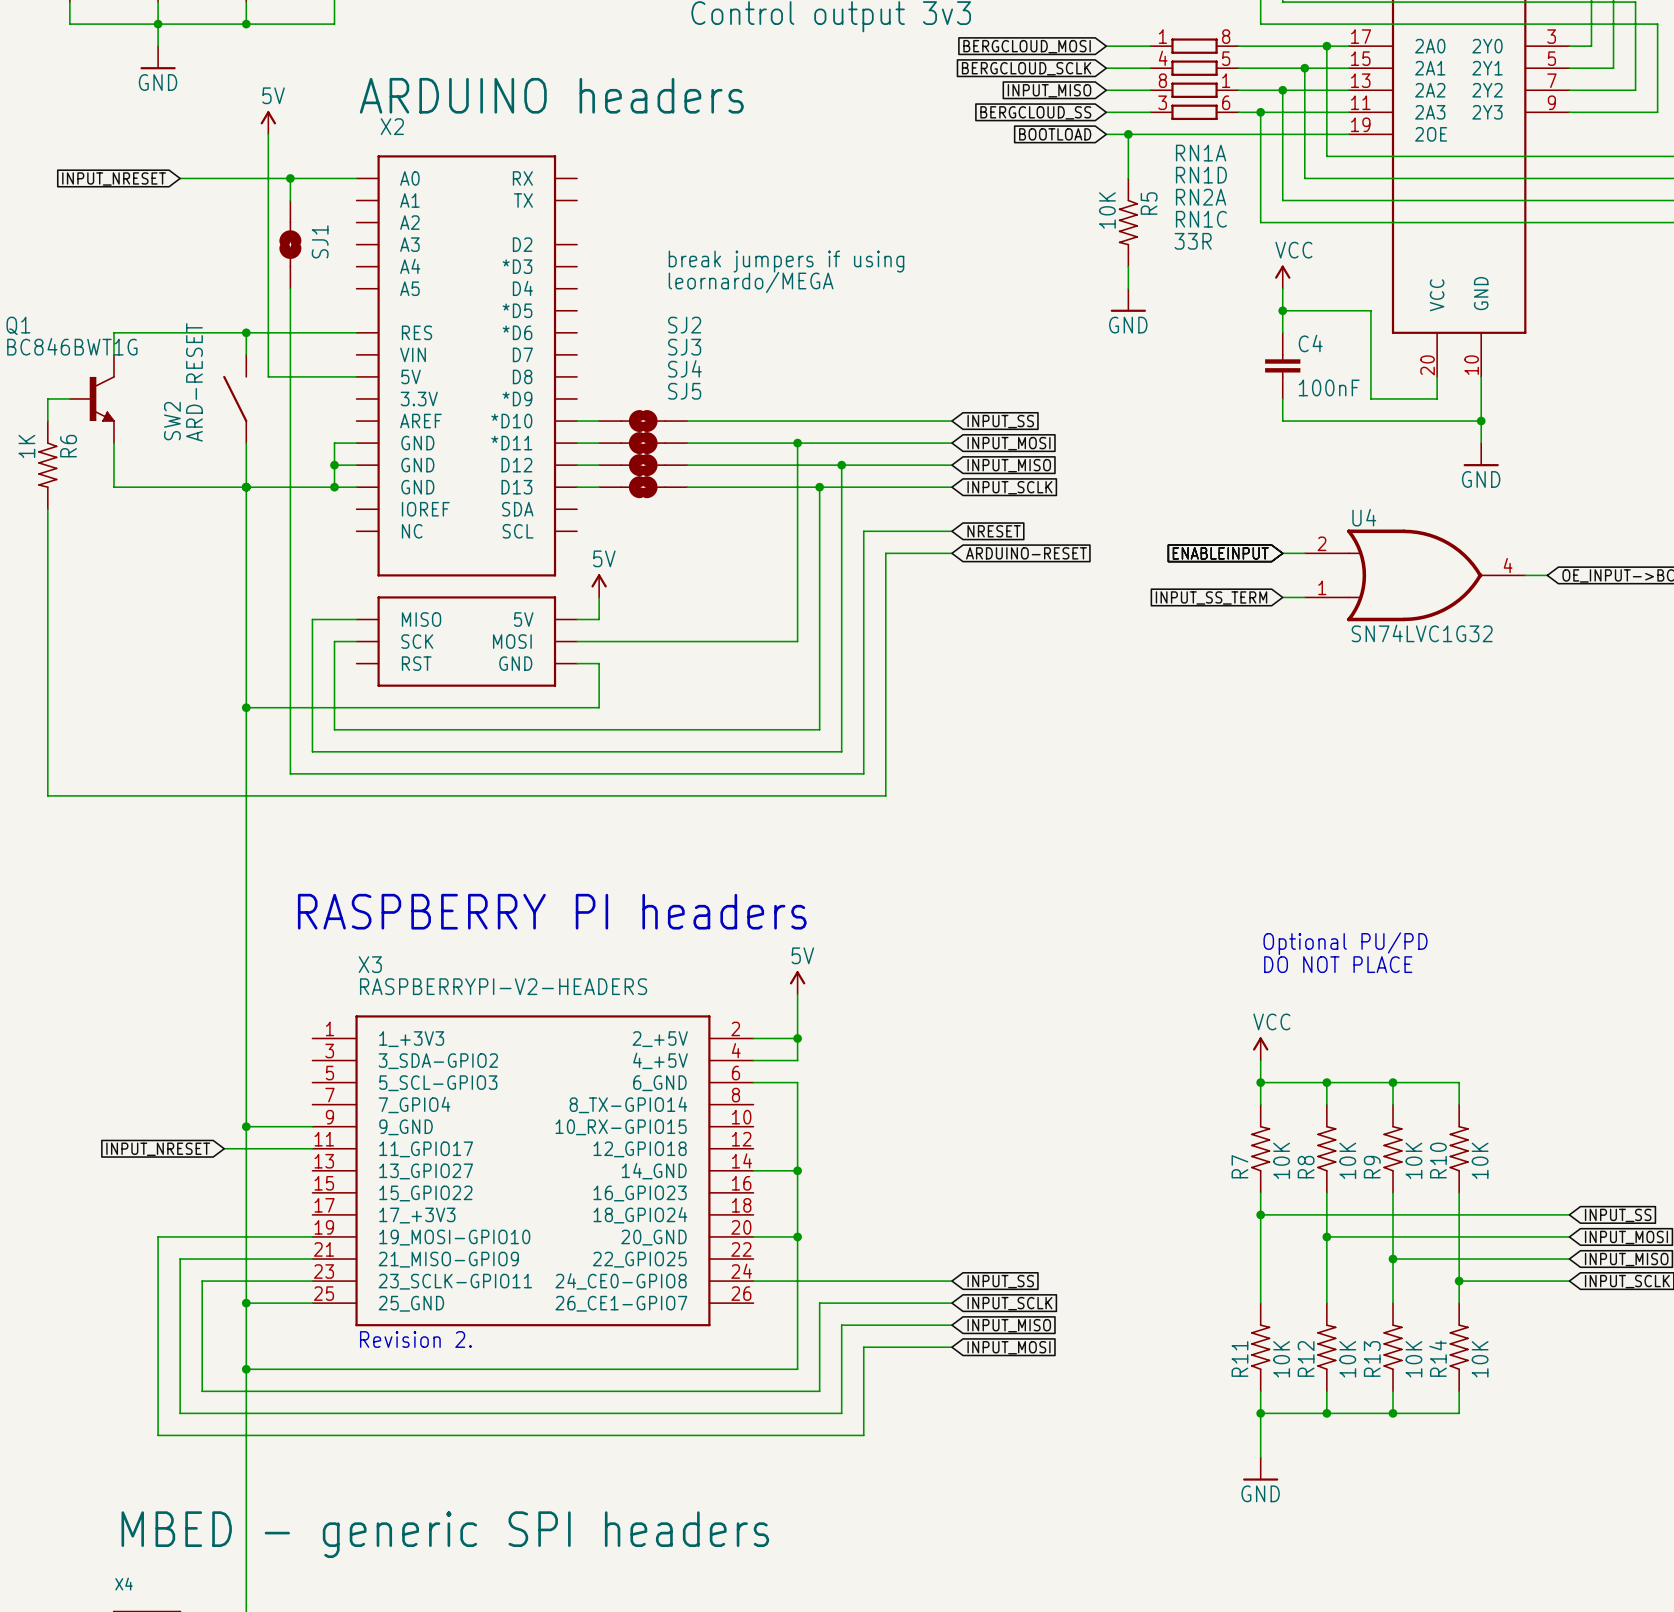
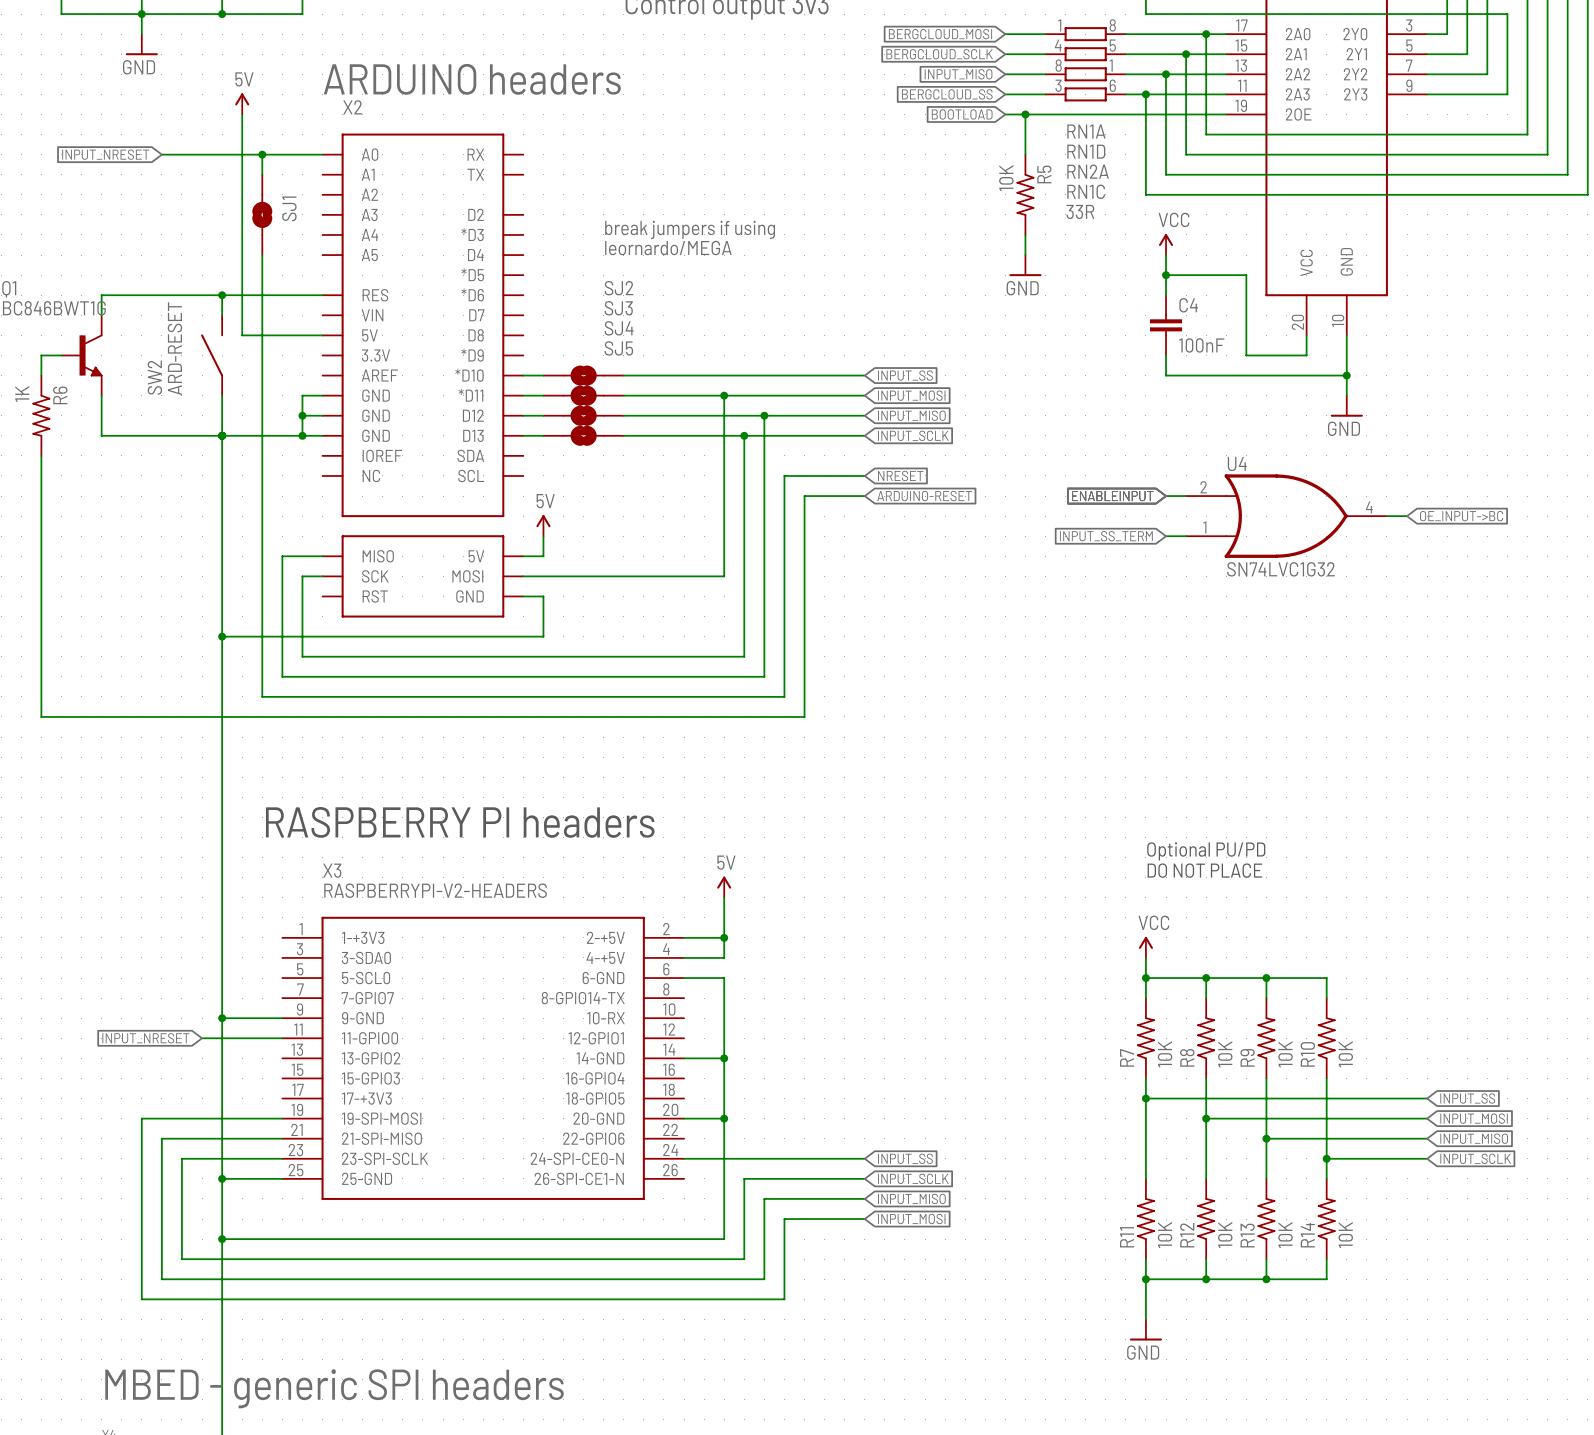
X3 symbol: [312, 1015, 754, 1327] -> [282, 916, 685, 1200]

